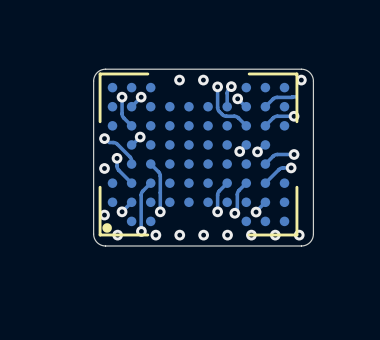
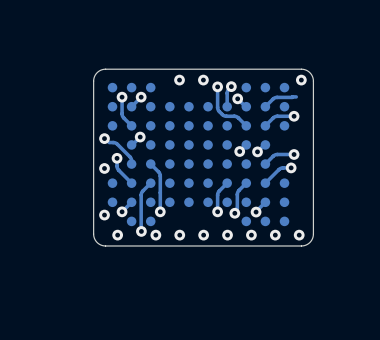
part footprint: [98, 72, 299, 237] -> [107, 82, 290, 227]

